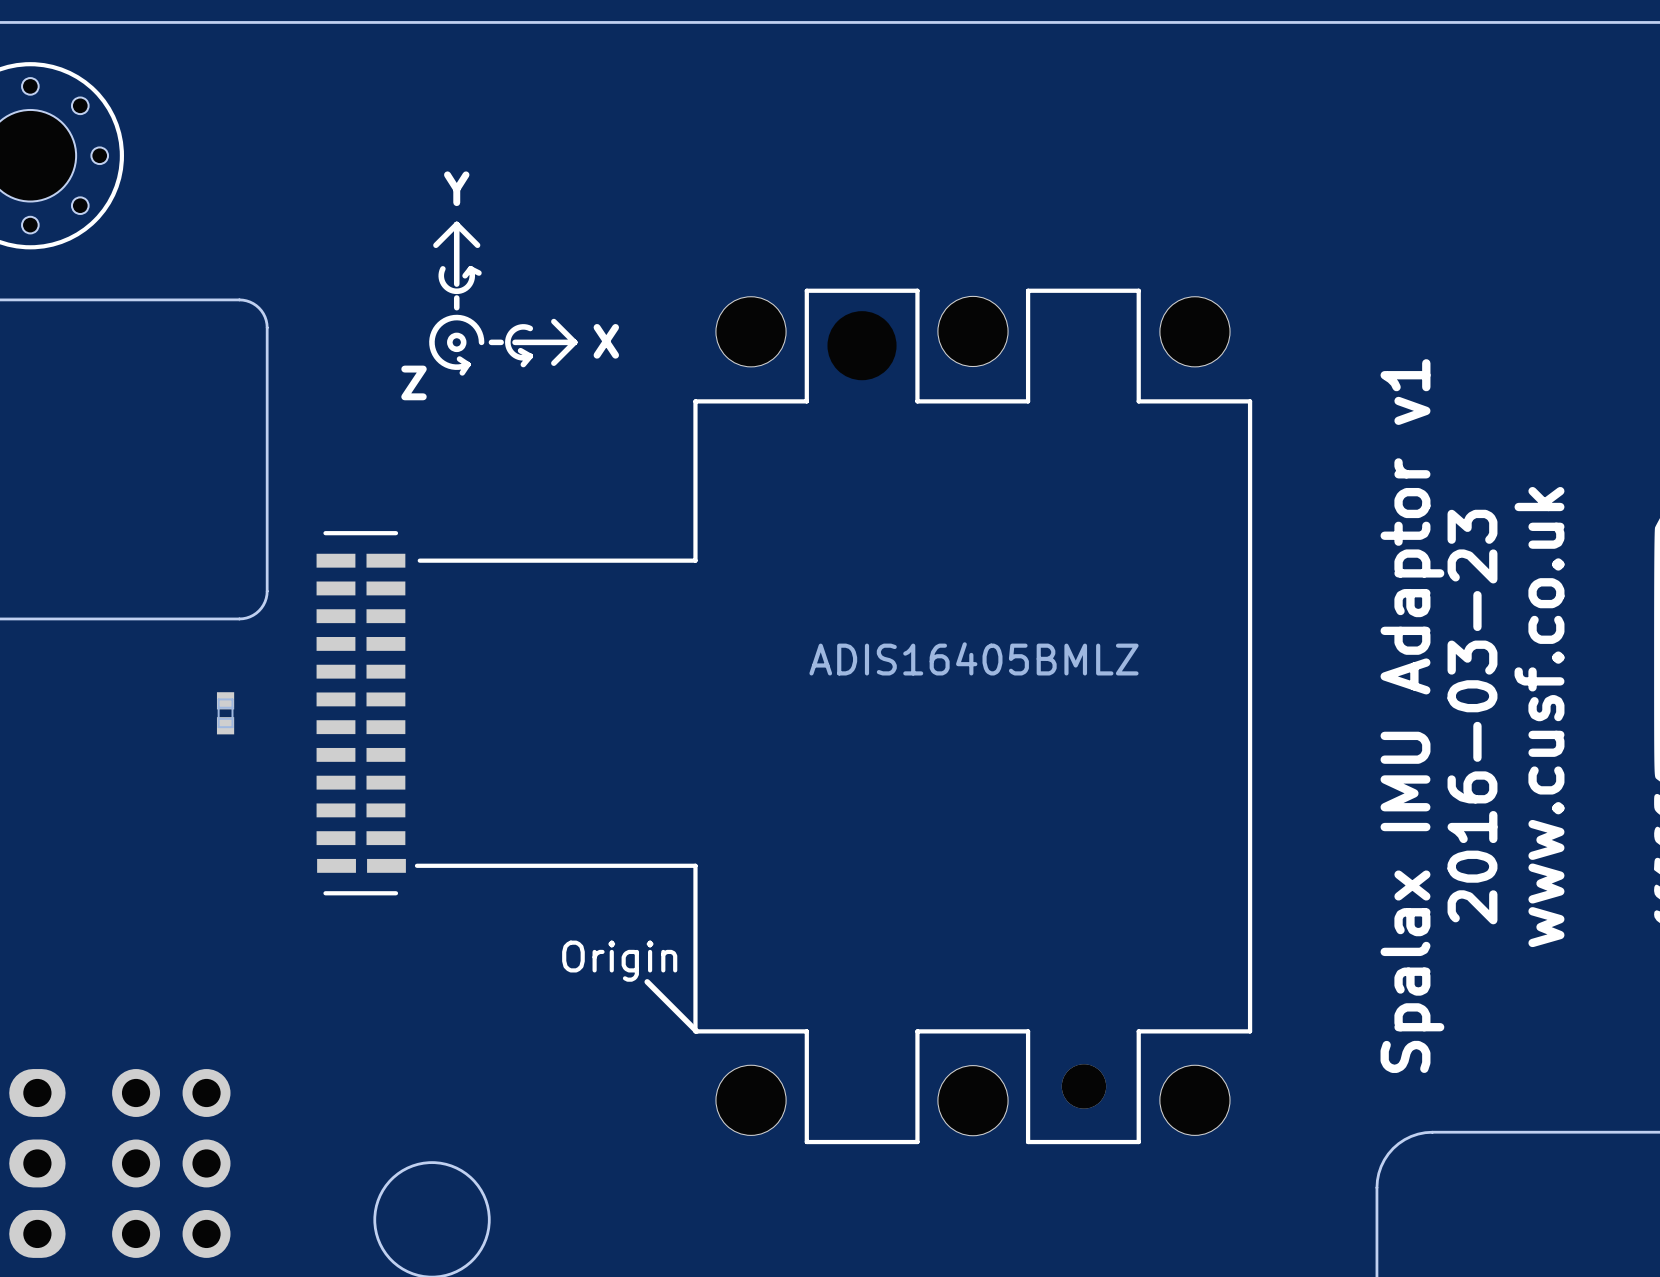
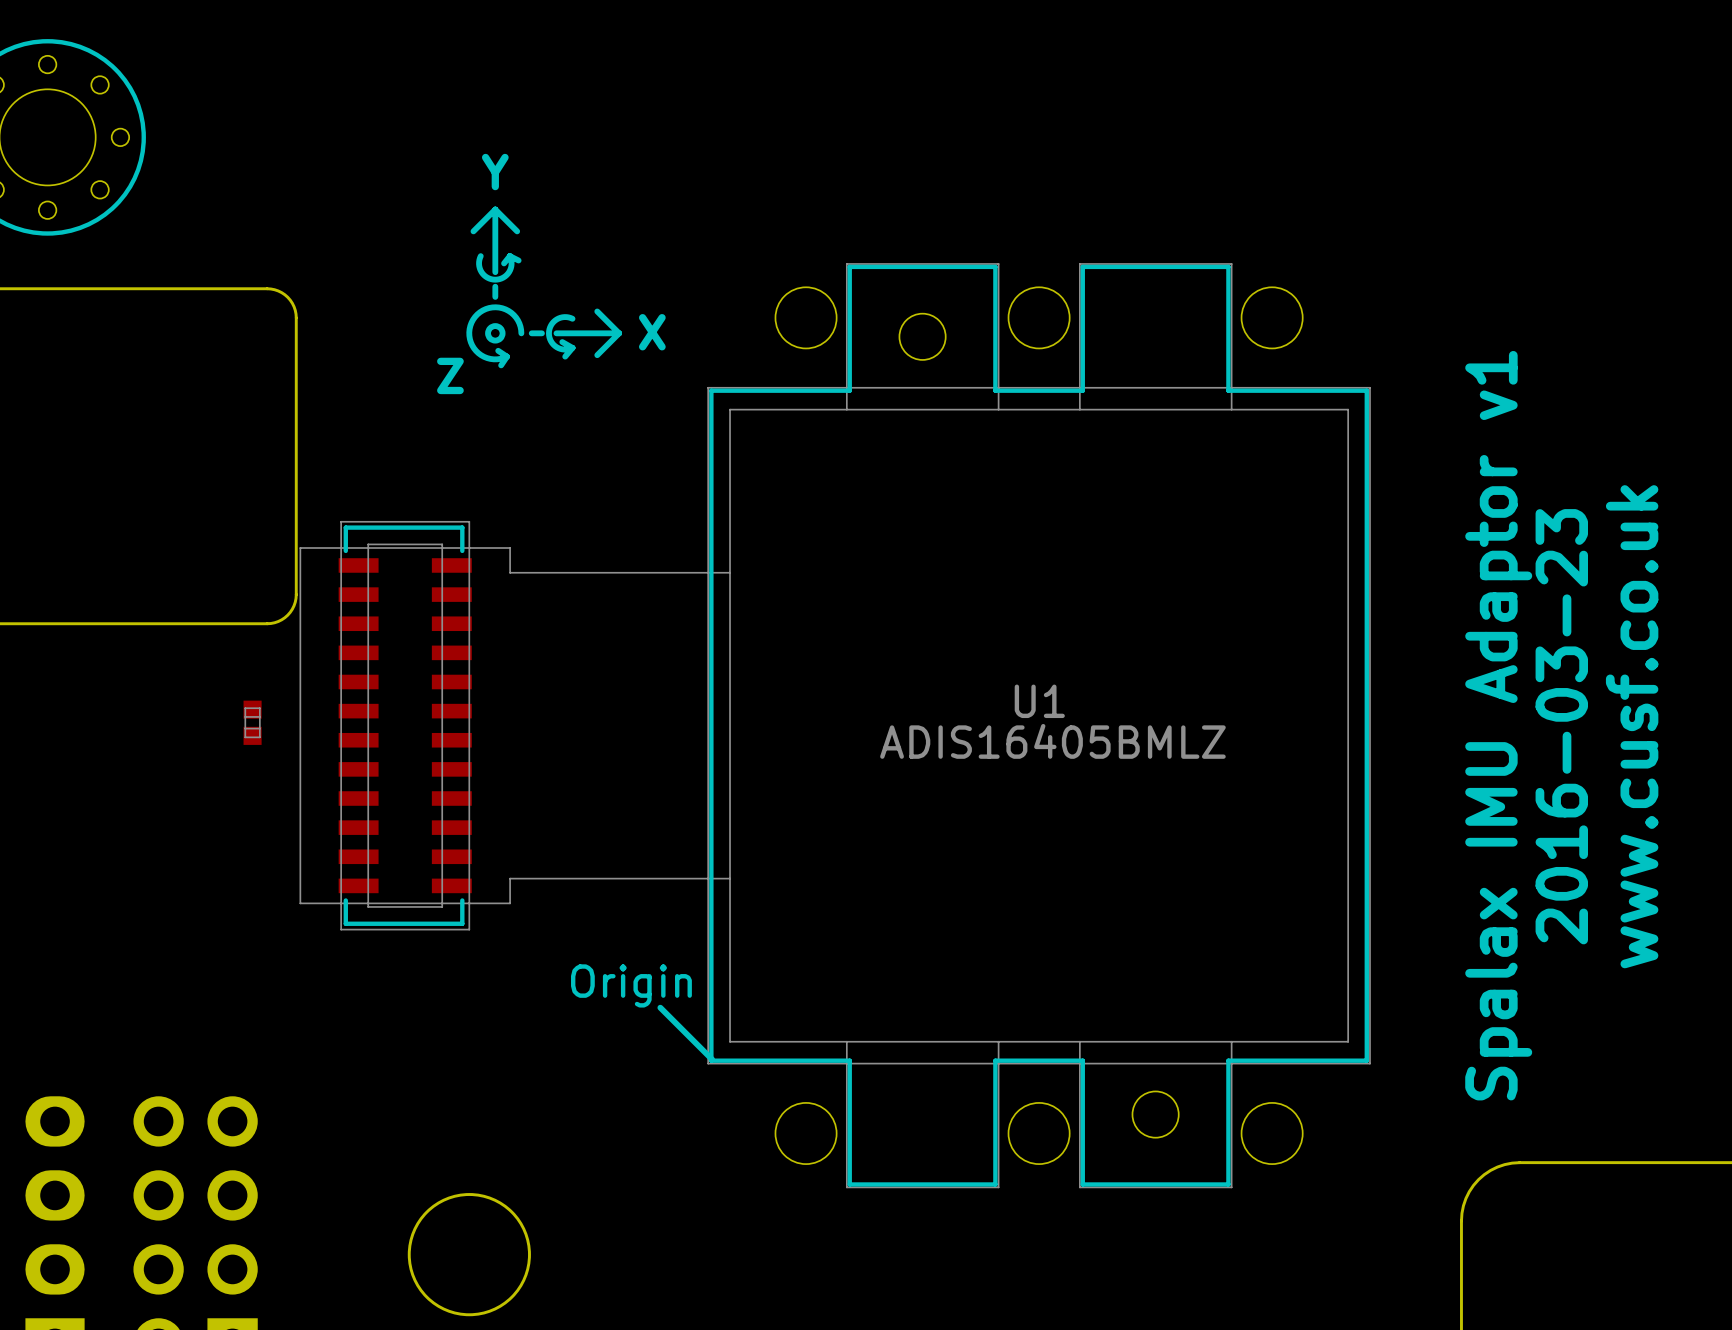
U1: none -> ADIS16405BMLZ (835, 725)
part: ADIS16405BMLZ (784, 716) -> none
text position: Origin (619, 961) -> Origin (631, 985)
line: (647, 981) (696, 1031) -> (660, 1007) (712, 1059)

